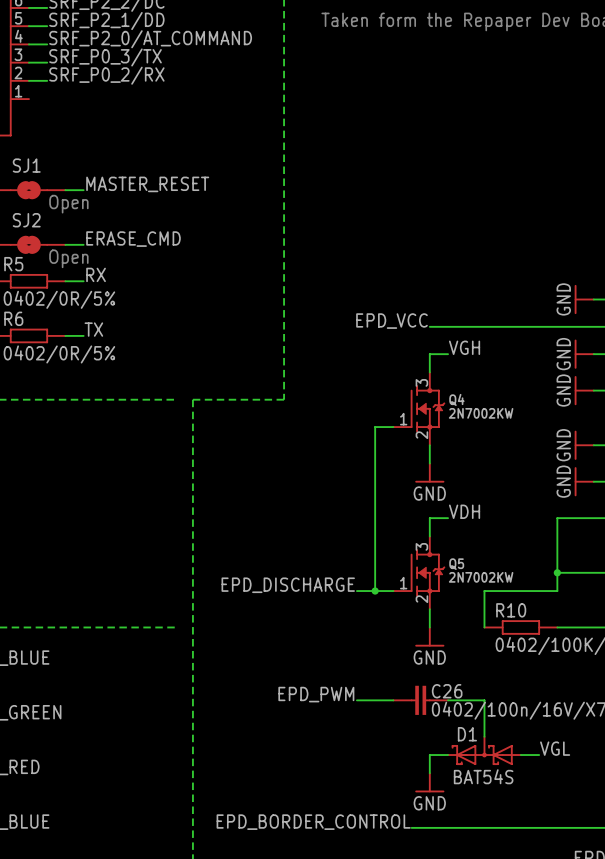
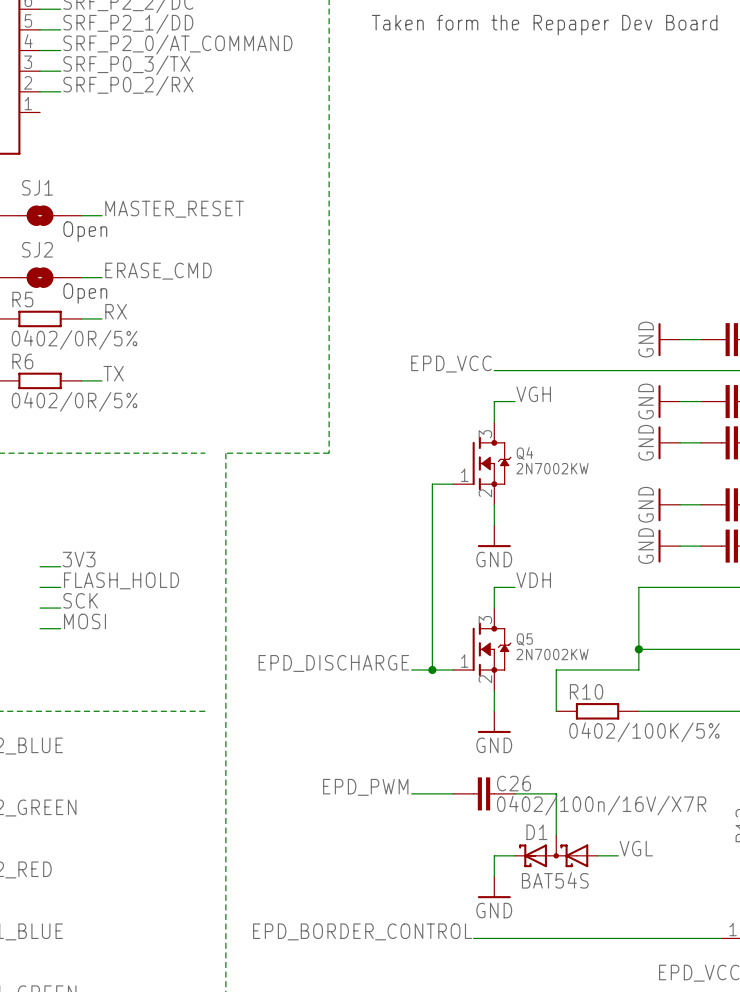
label: none -> 3V3 (79, 559)
wire: none -> (40, 566) (60, 566)
label: none -> FLASH_HOLD (121, 580)
wire: none -> (40, 587) (60, 587)
label: none -> SCK (80, 600)
wire: none -> (40, 608) (60, 608)
label: none -> MOSI (84, 621)
wire: none -> (40, 628) (60, 628)

